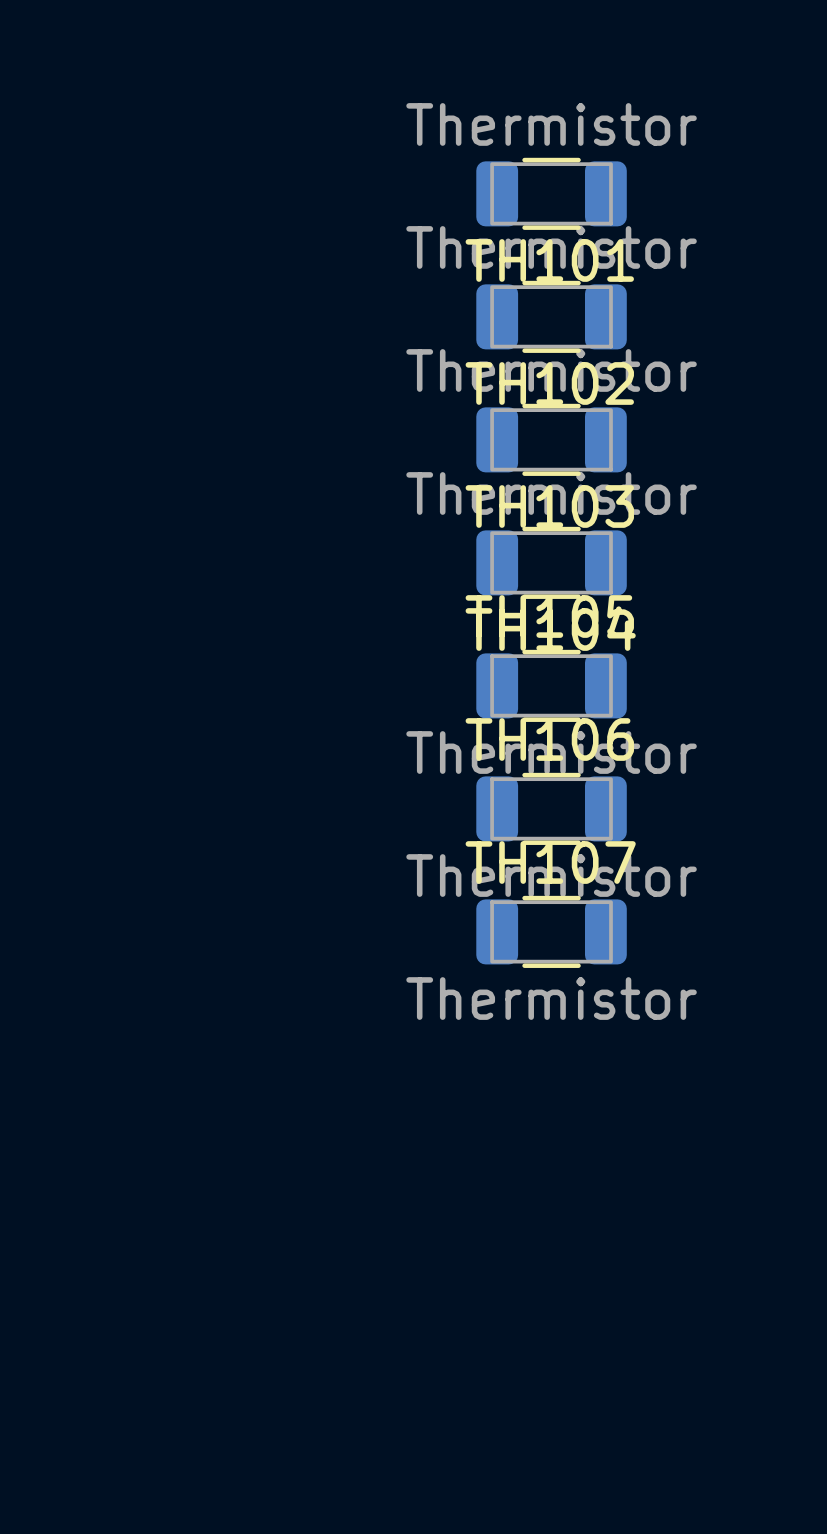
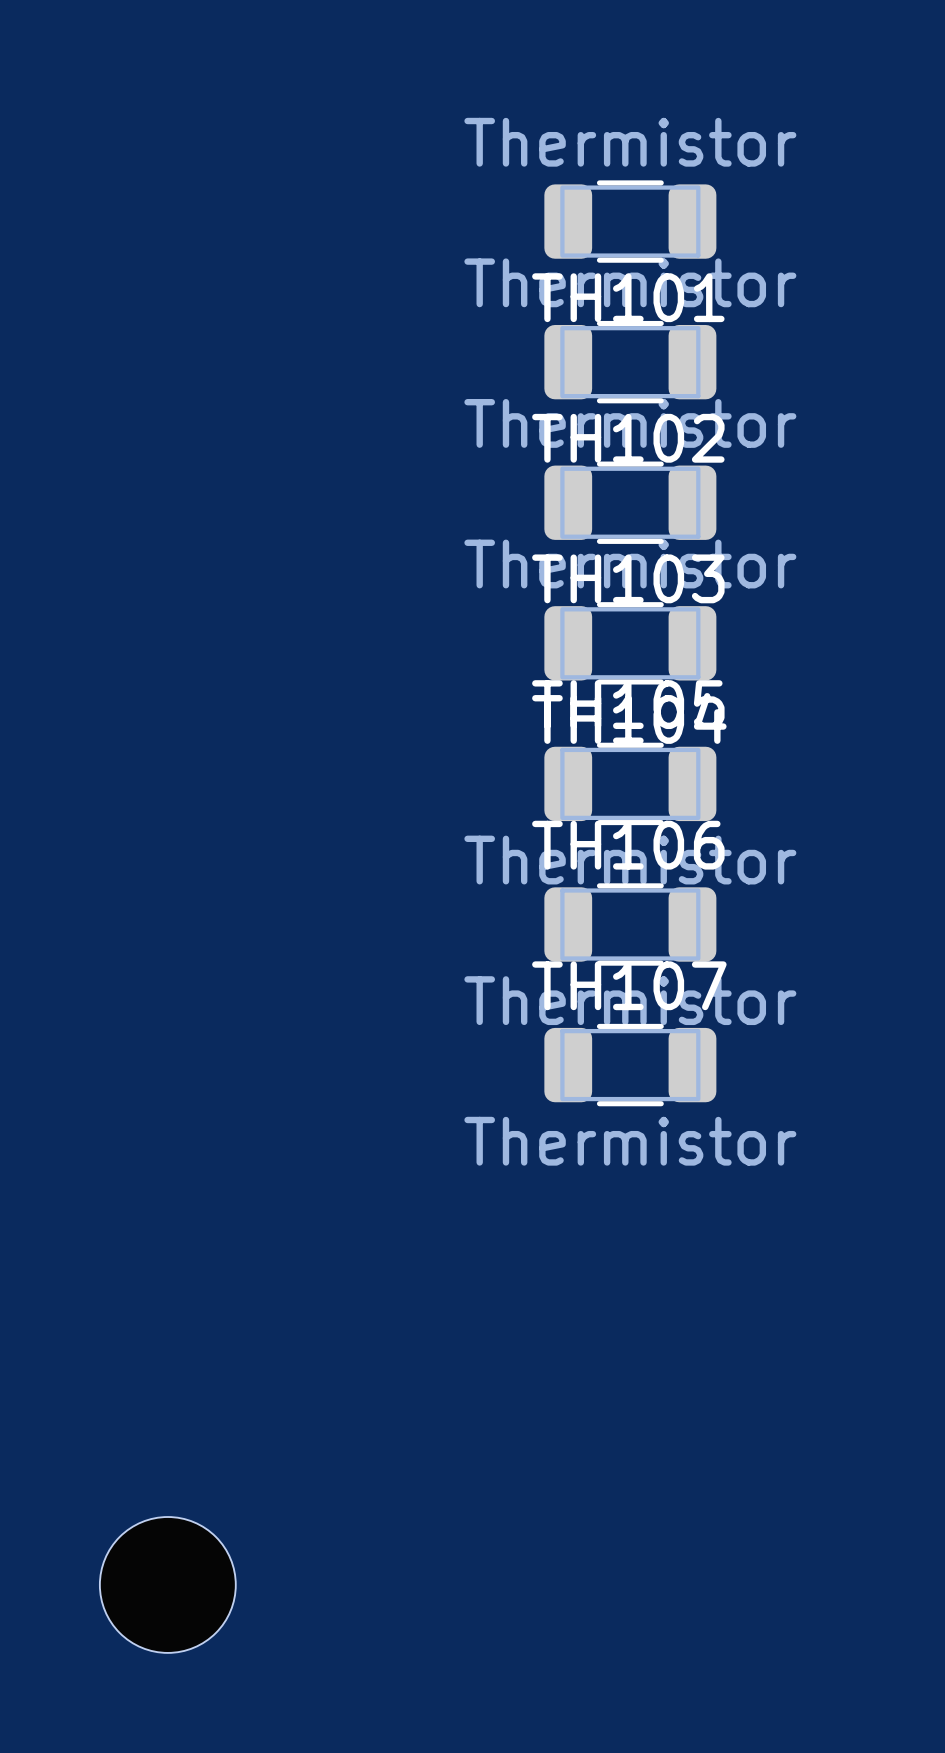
part: none -> (167, 1584)

